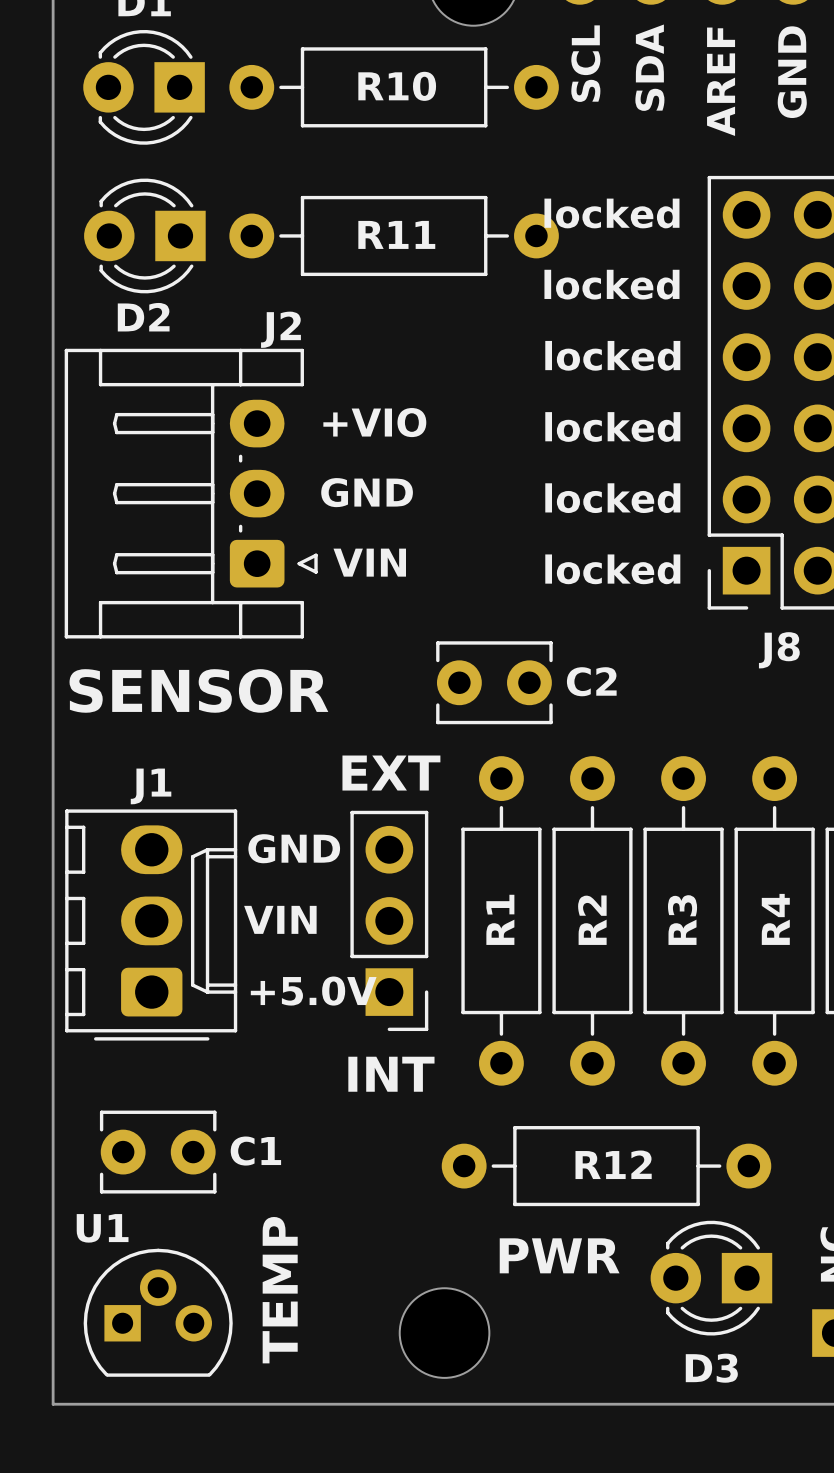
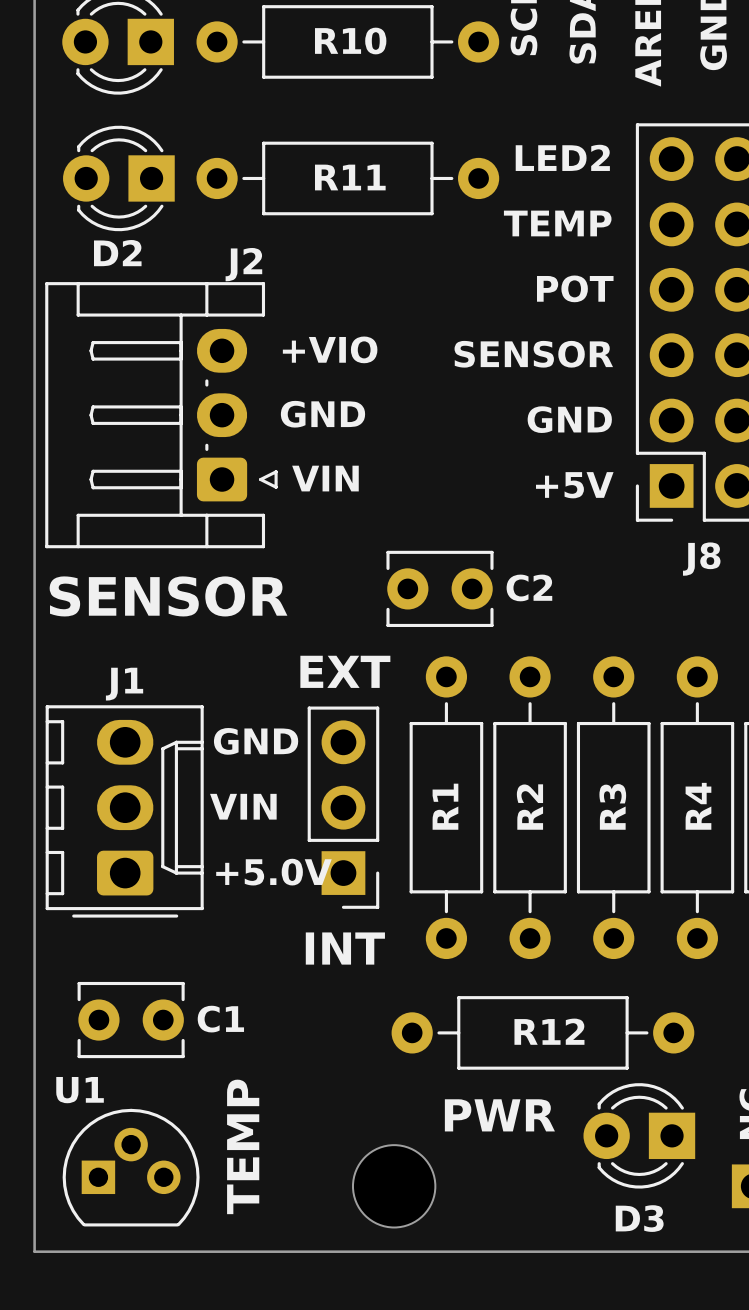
text: locked (611, 213) -> LED2 (562, 157)
text: locked (611, 284) -> TEMP (557, 223)
text: locked (612, 355) -> POT (575, 288)
text: locked (612, 426) -> SENSOR (533, 354)
text: locked (612, 498) -> GND (569, 419)
text: locked (612, 569) -> +5V (574, 485)

